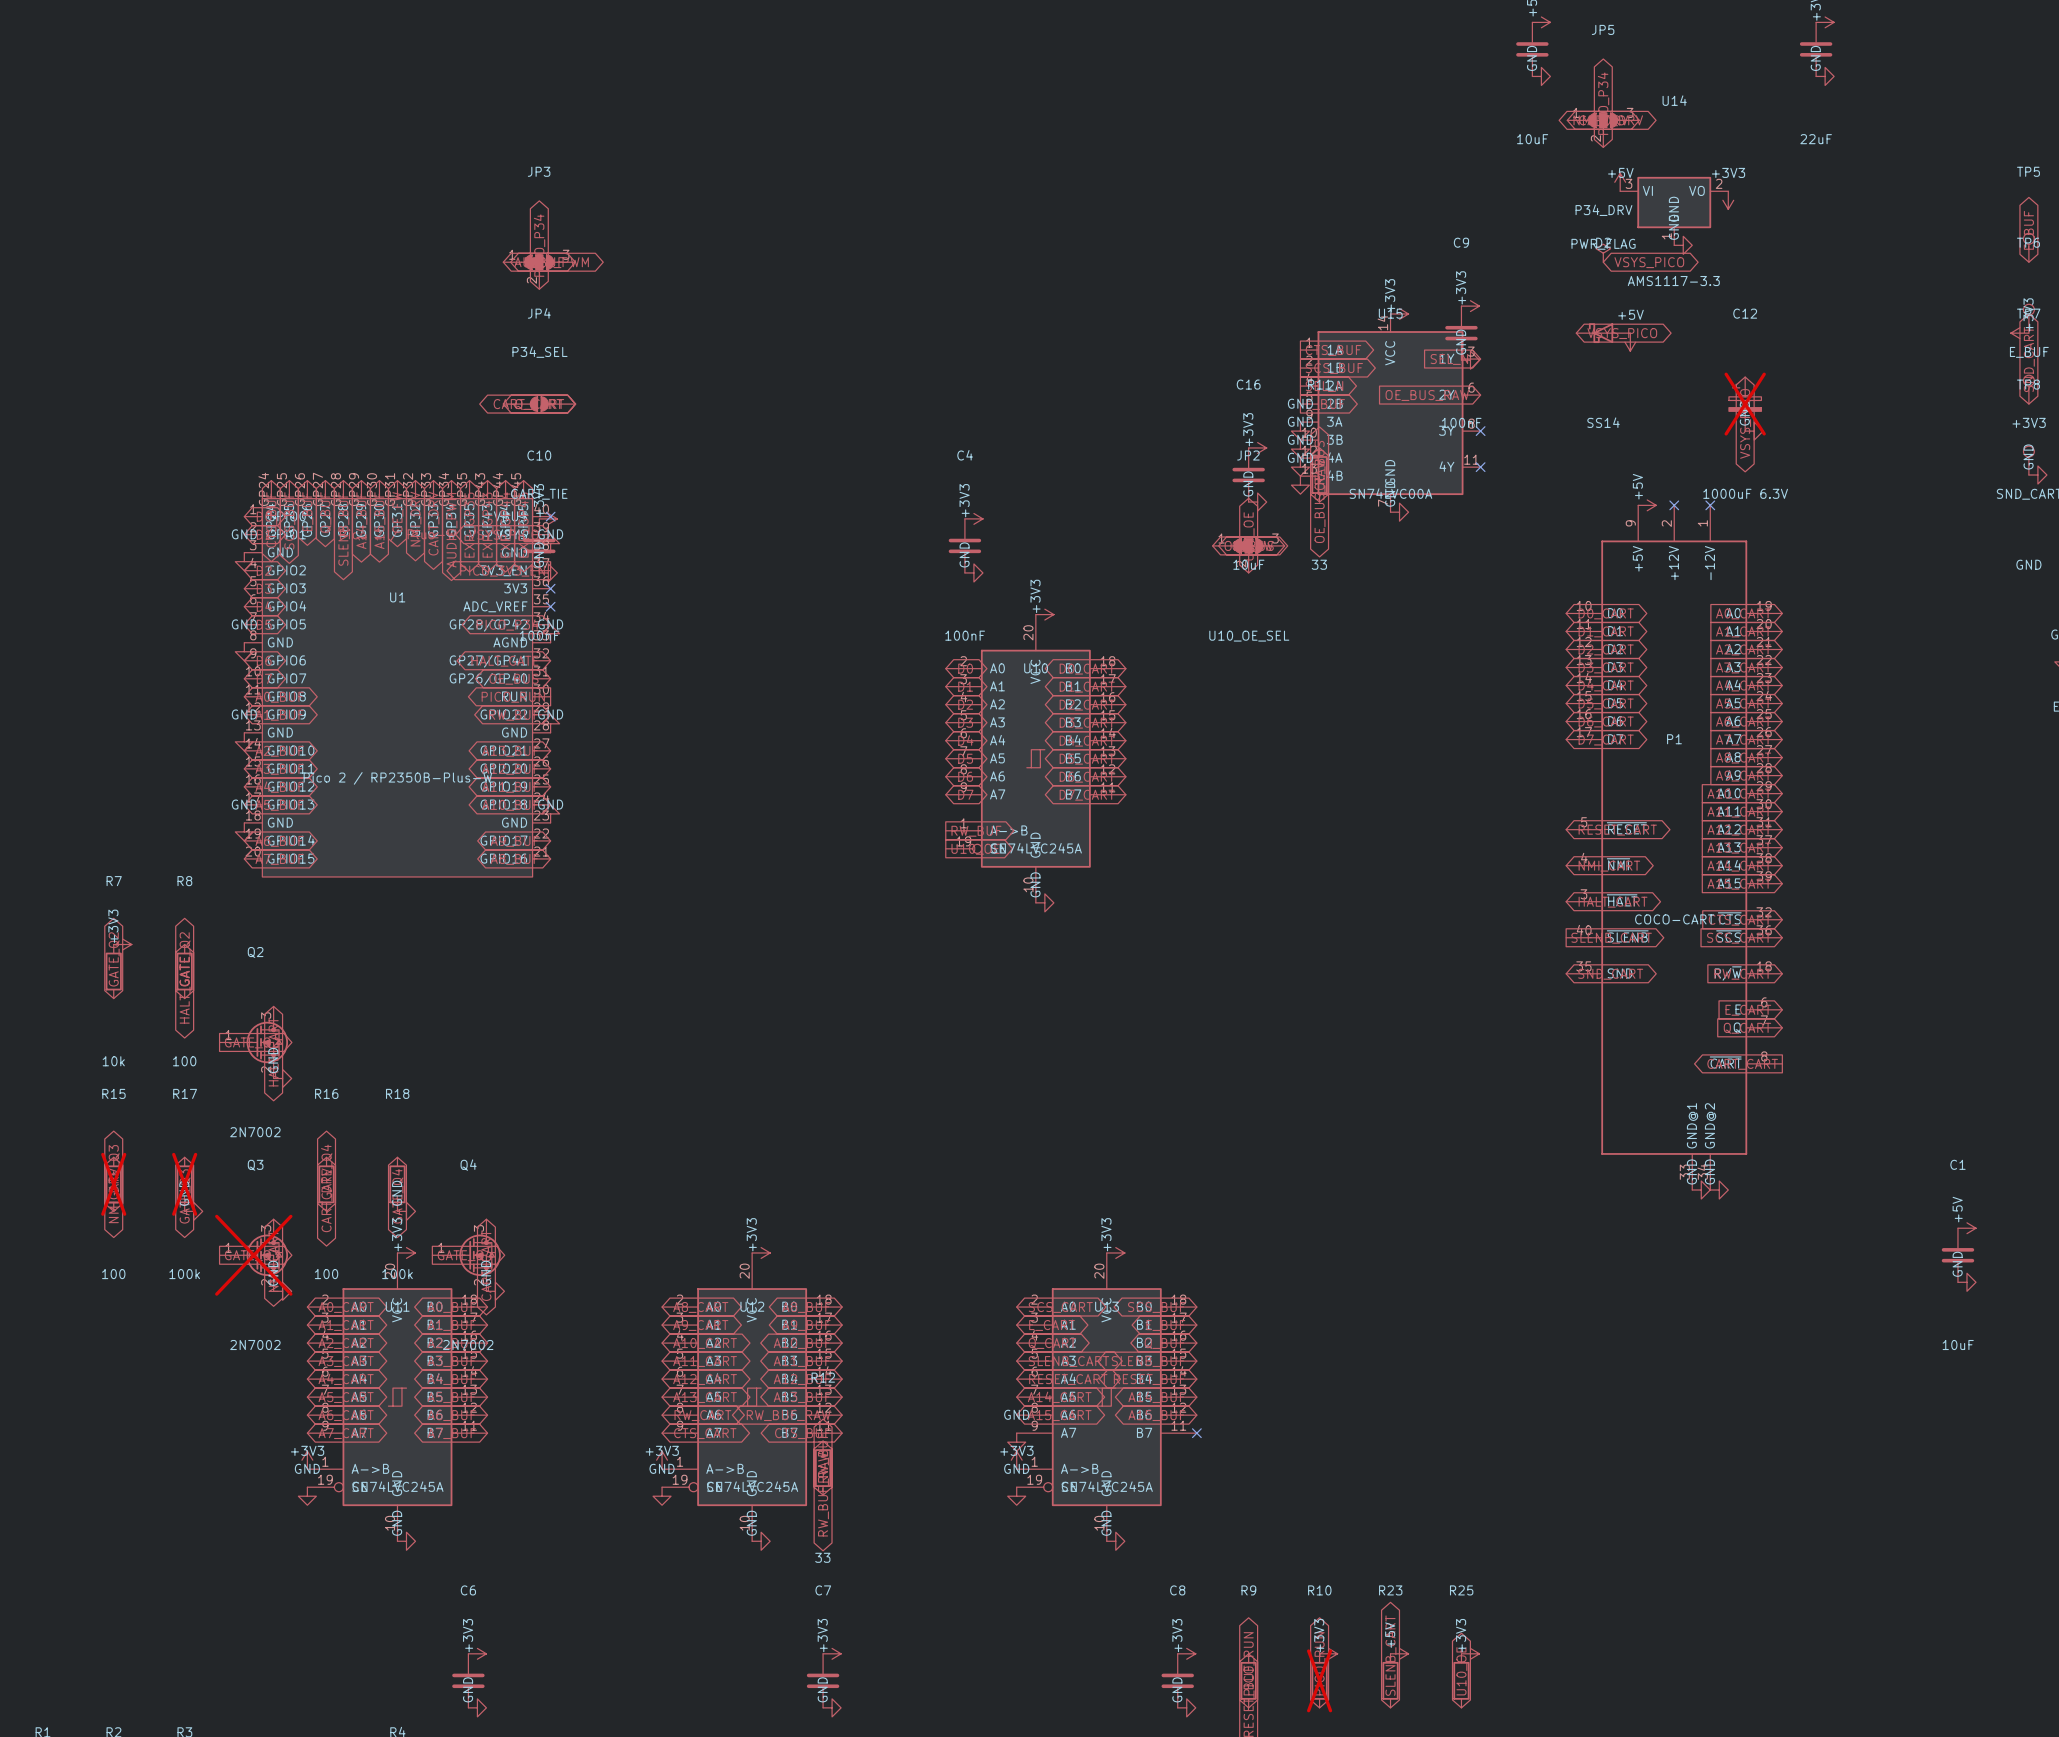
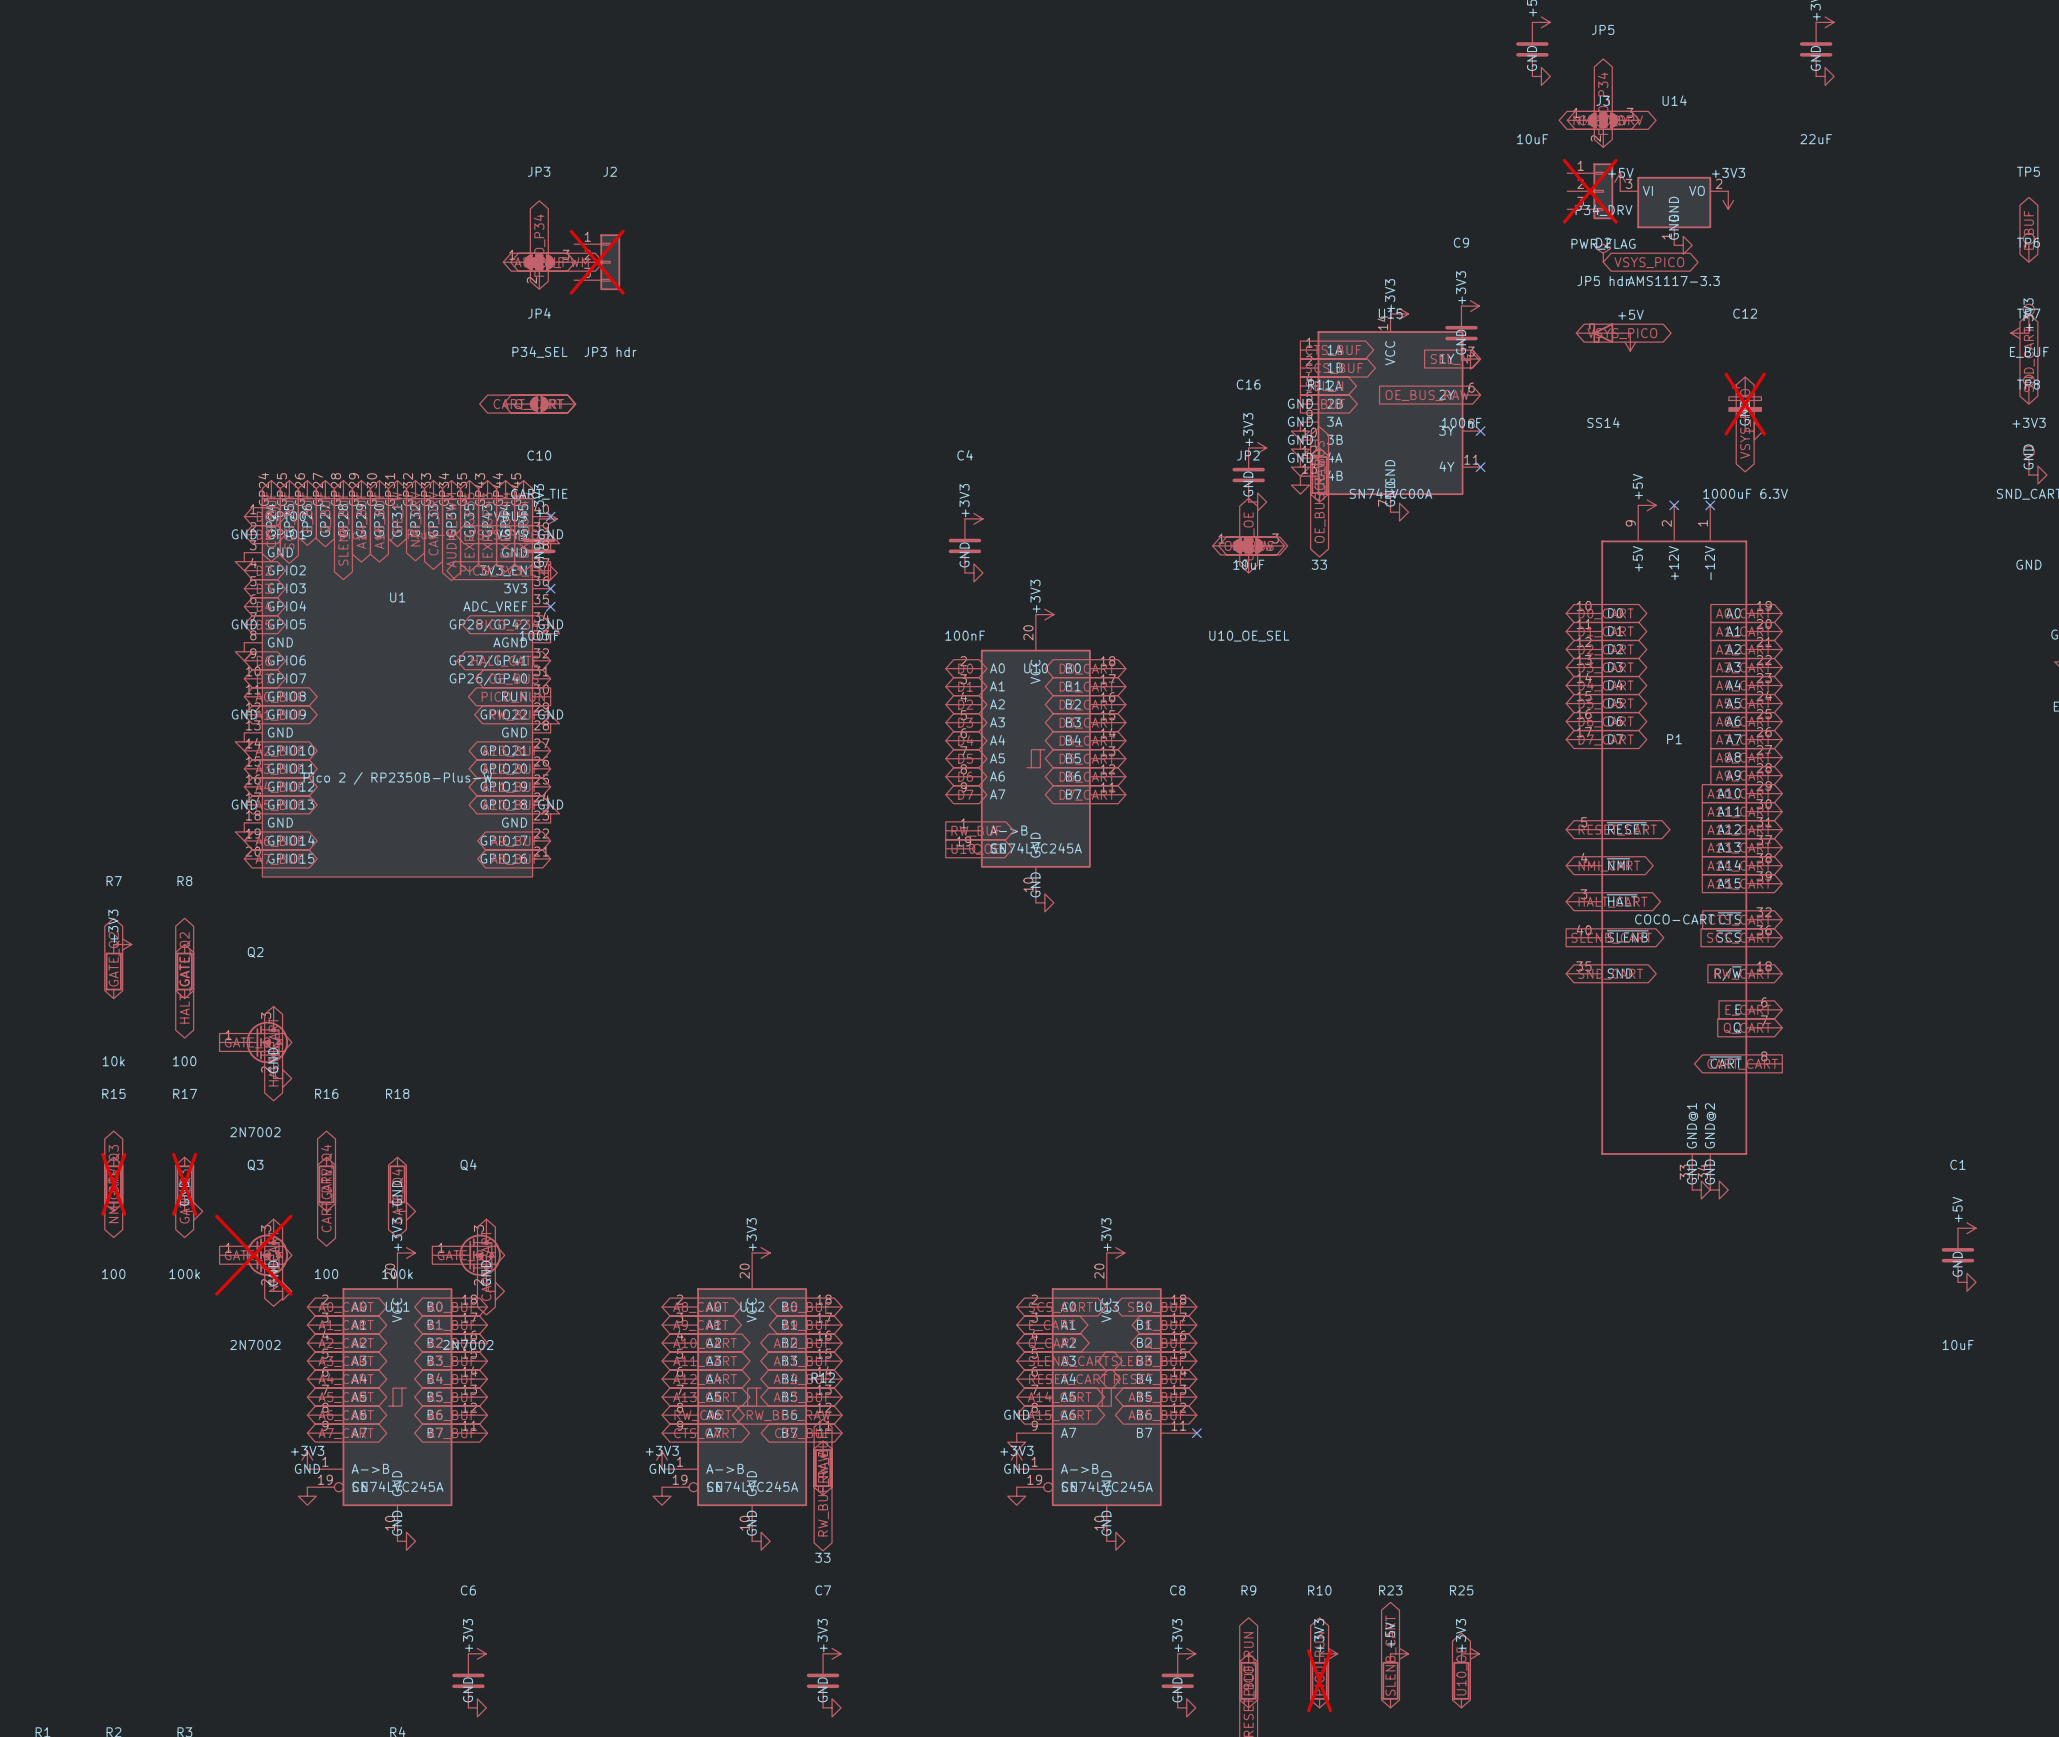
J3: none -> JP5 hdr (1590, 191)
J2: none -> JP3 hdr (597, 262)

